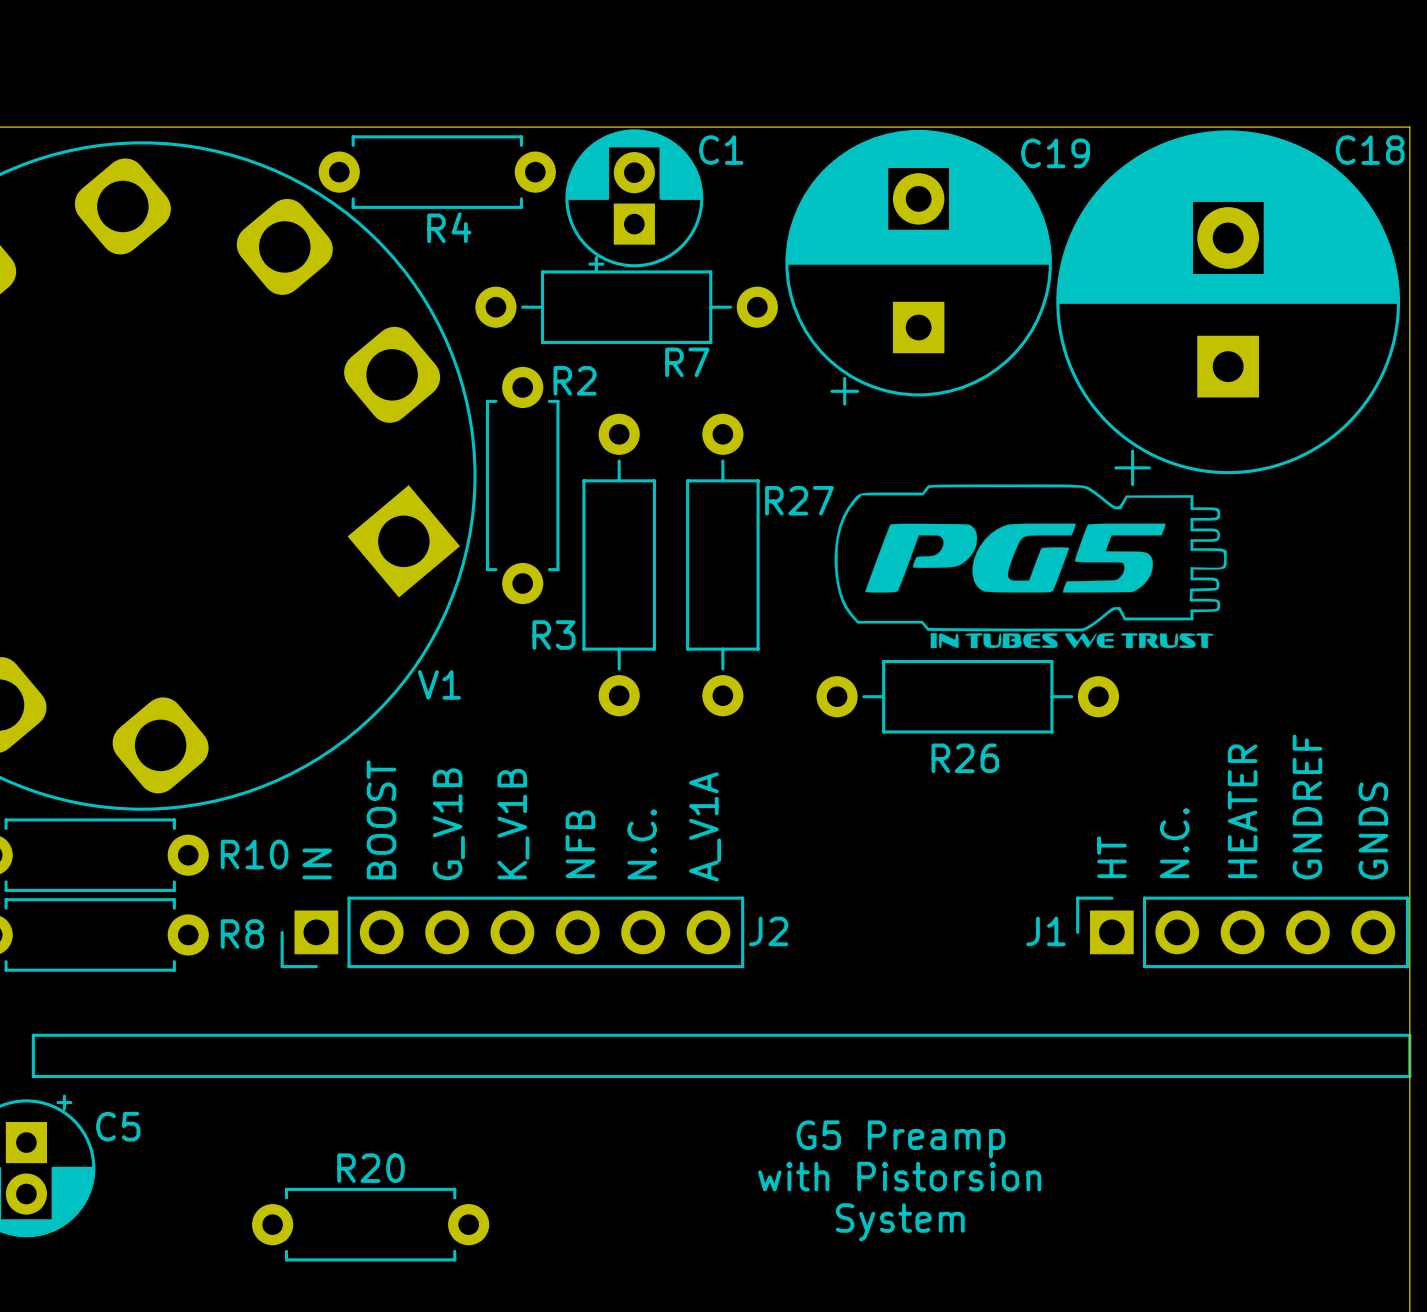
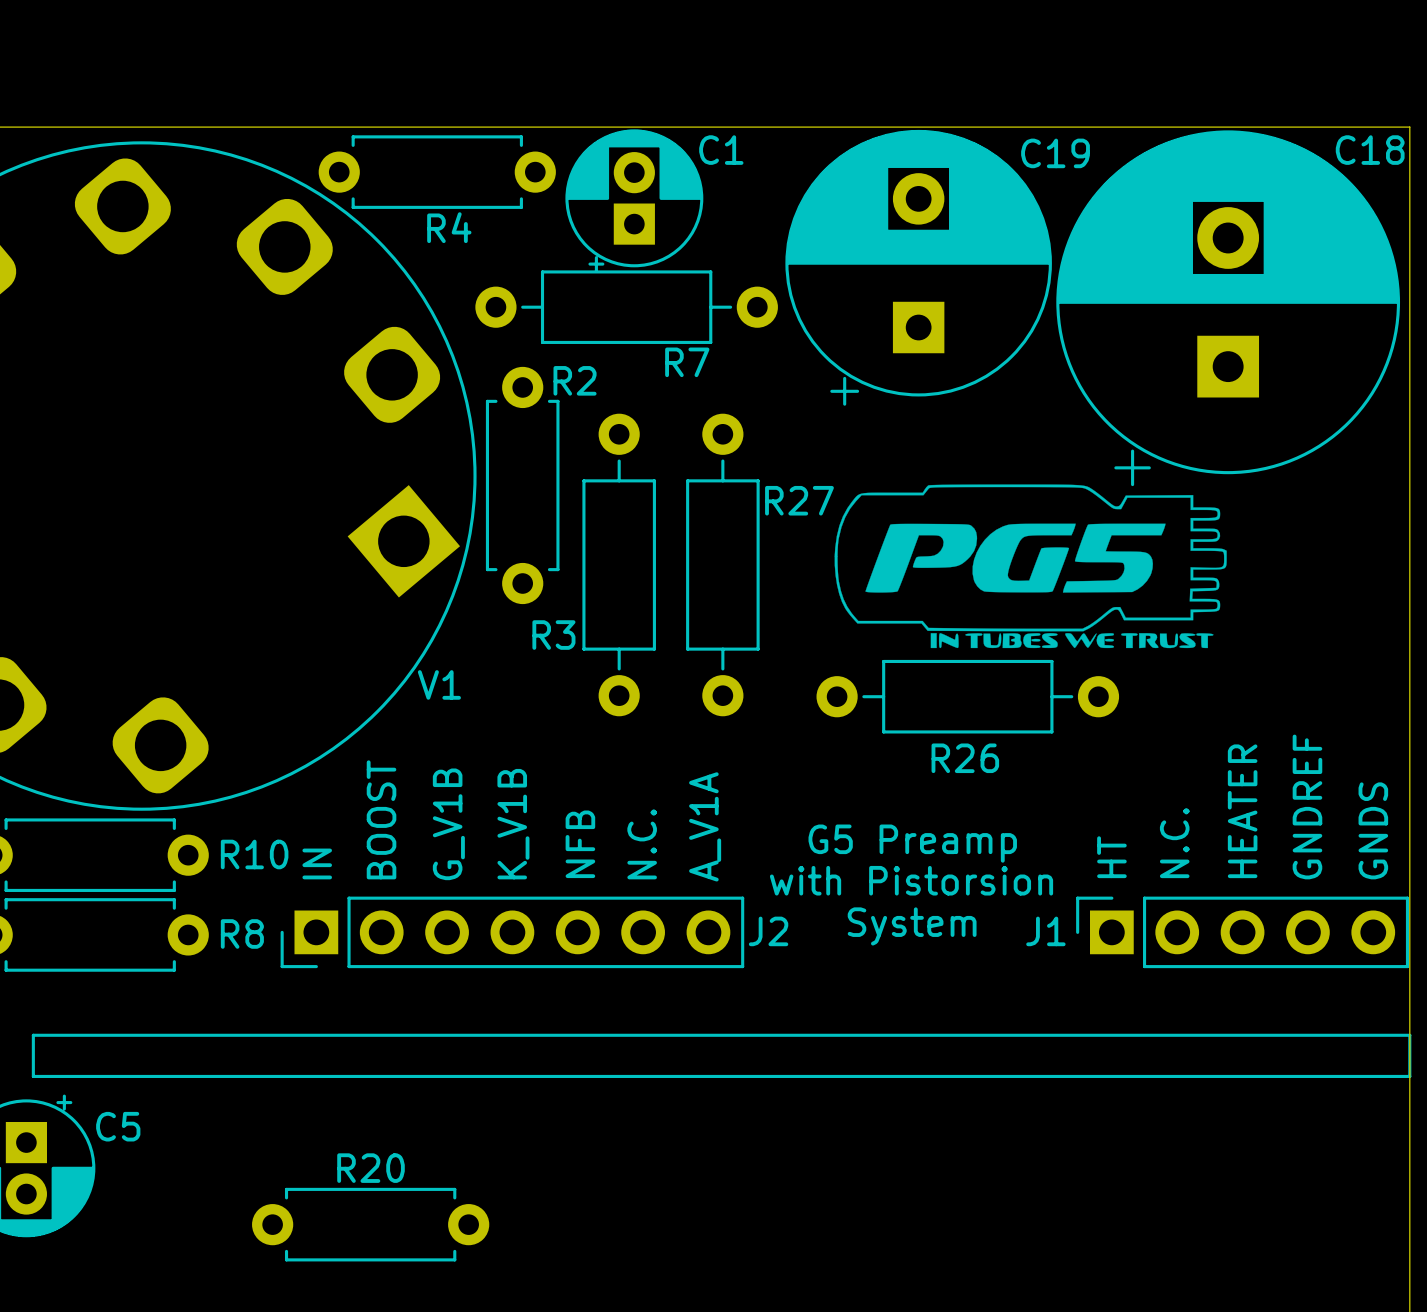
text position: G5 Preamp (900, 1139) -> G5 Preamp (912, 843)
text position: with Pistorsion (899, 1176) -> with Pistorsion (911, 880)
text position: System (900, 1222) -> System (912, 926)

